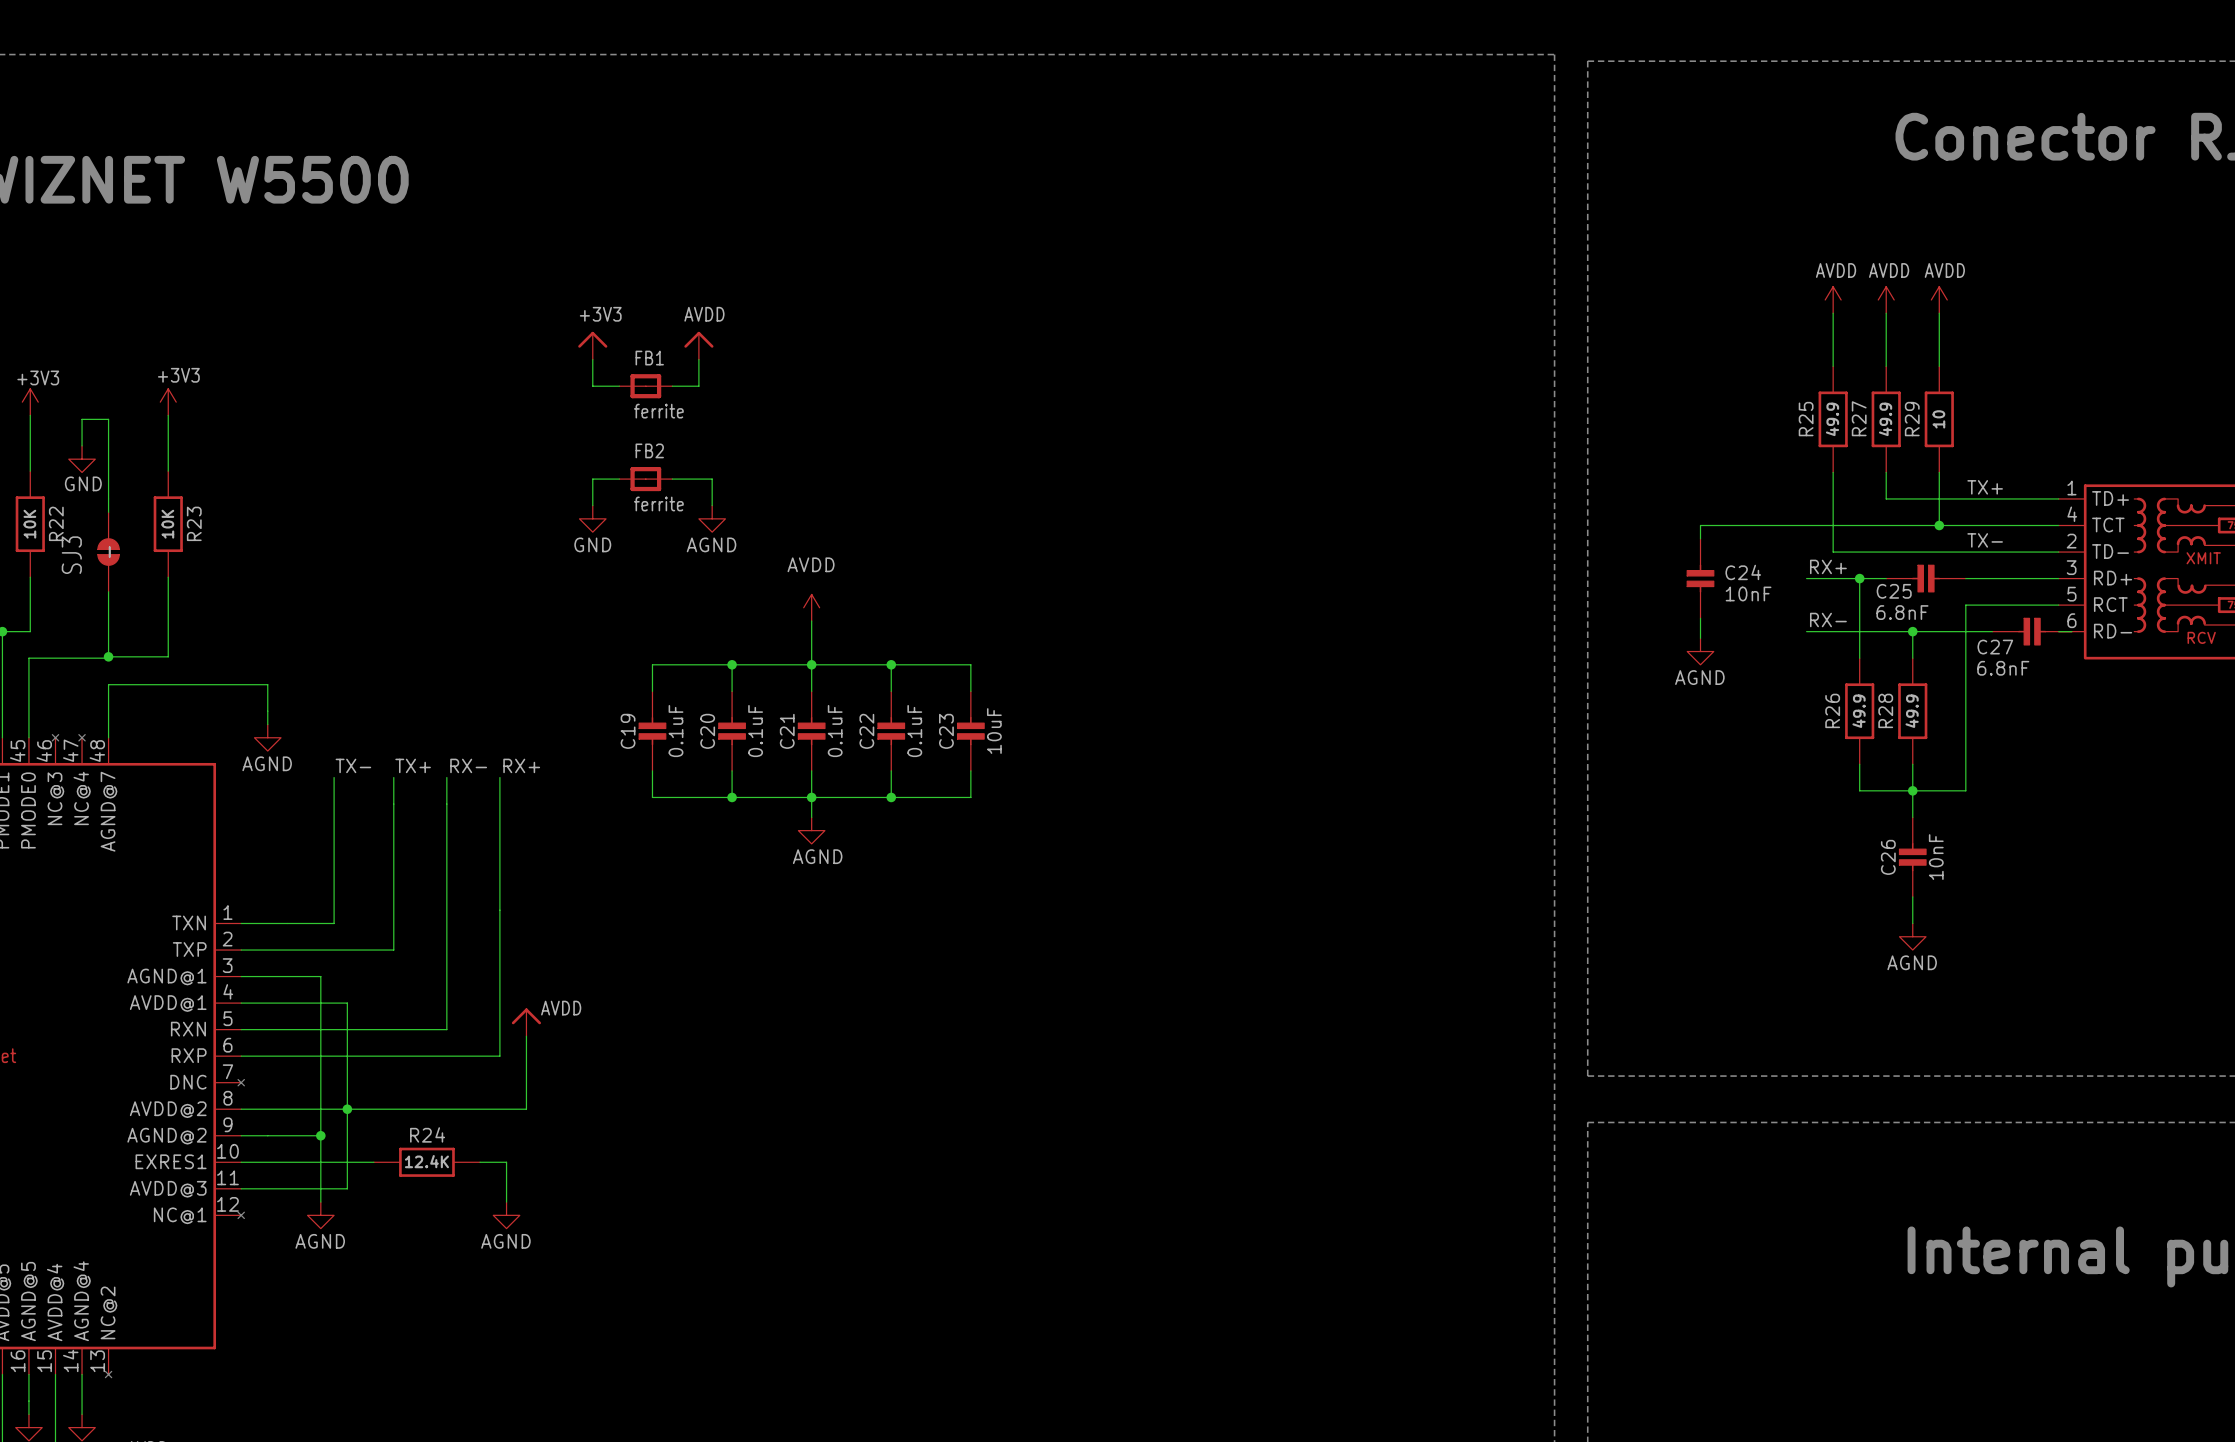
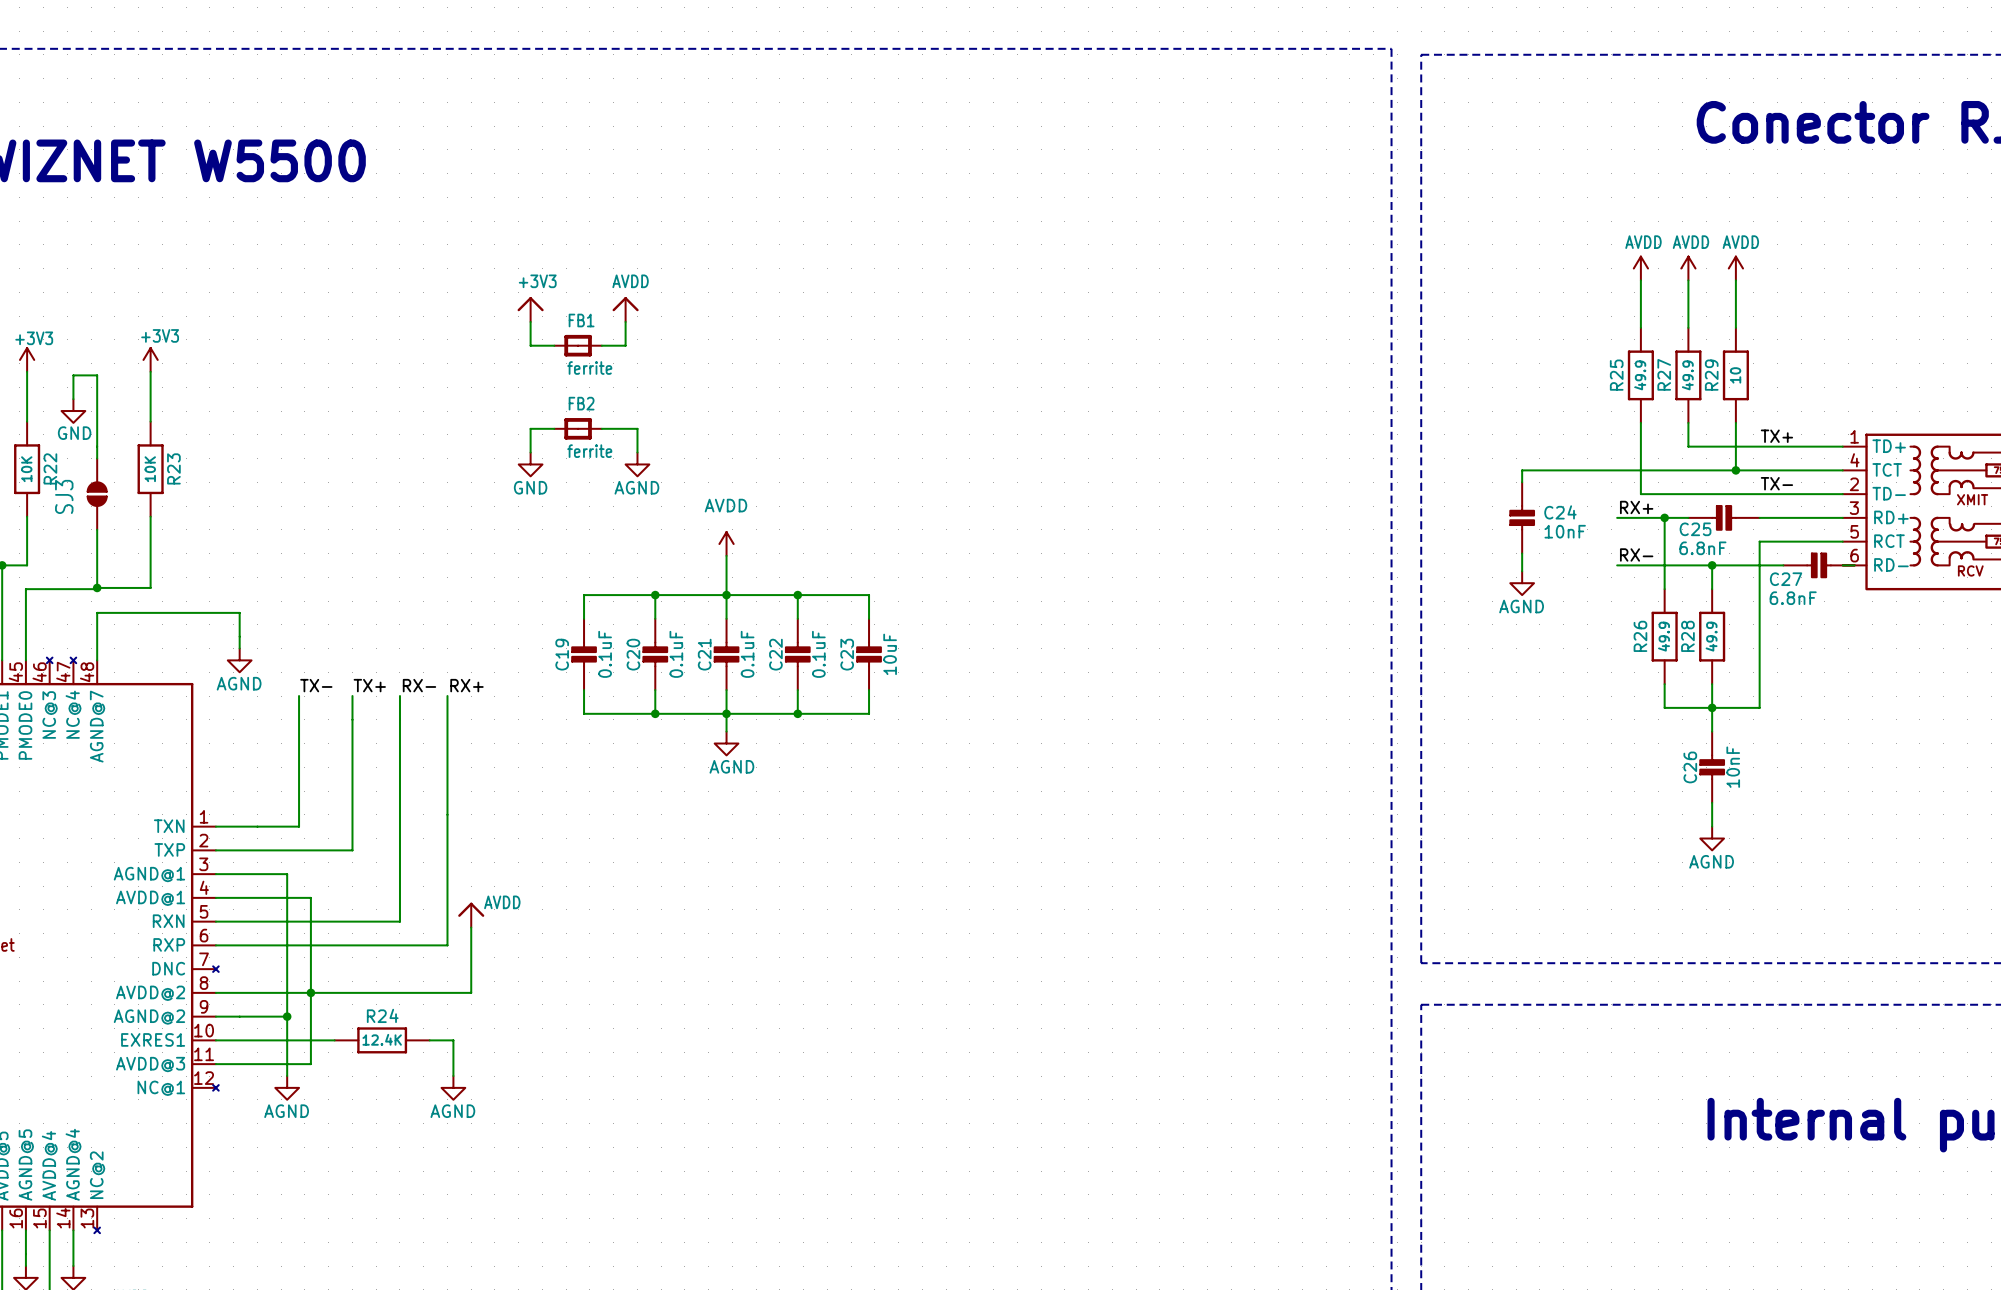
SJ3 text: - (109, 552) -> none
SJ3 text: - (109, 552) -> none

